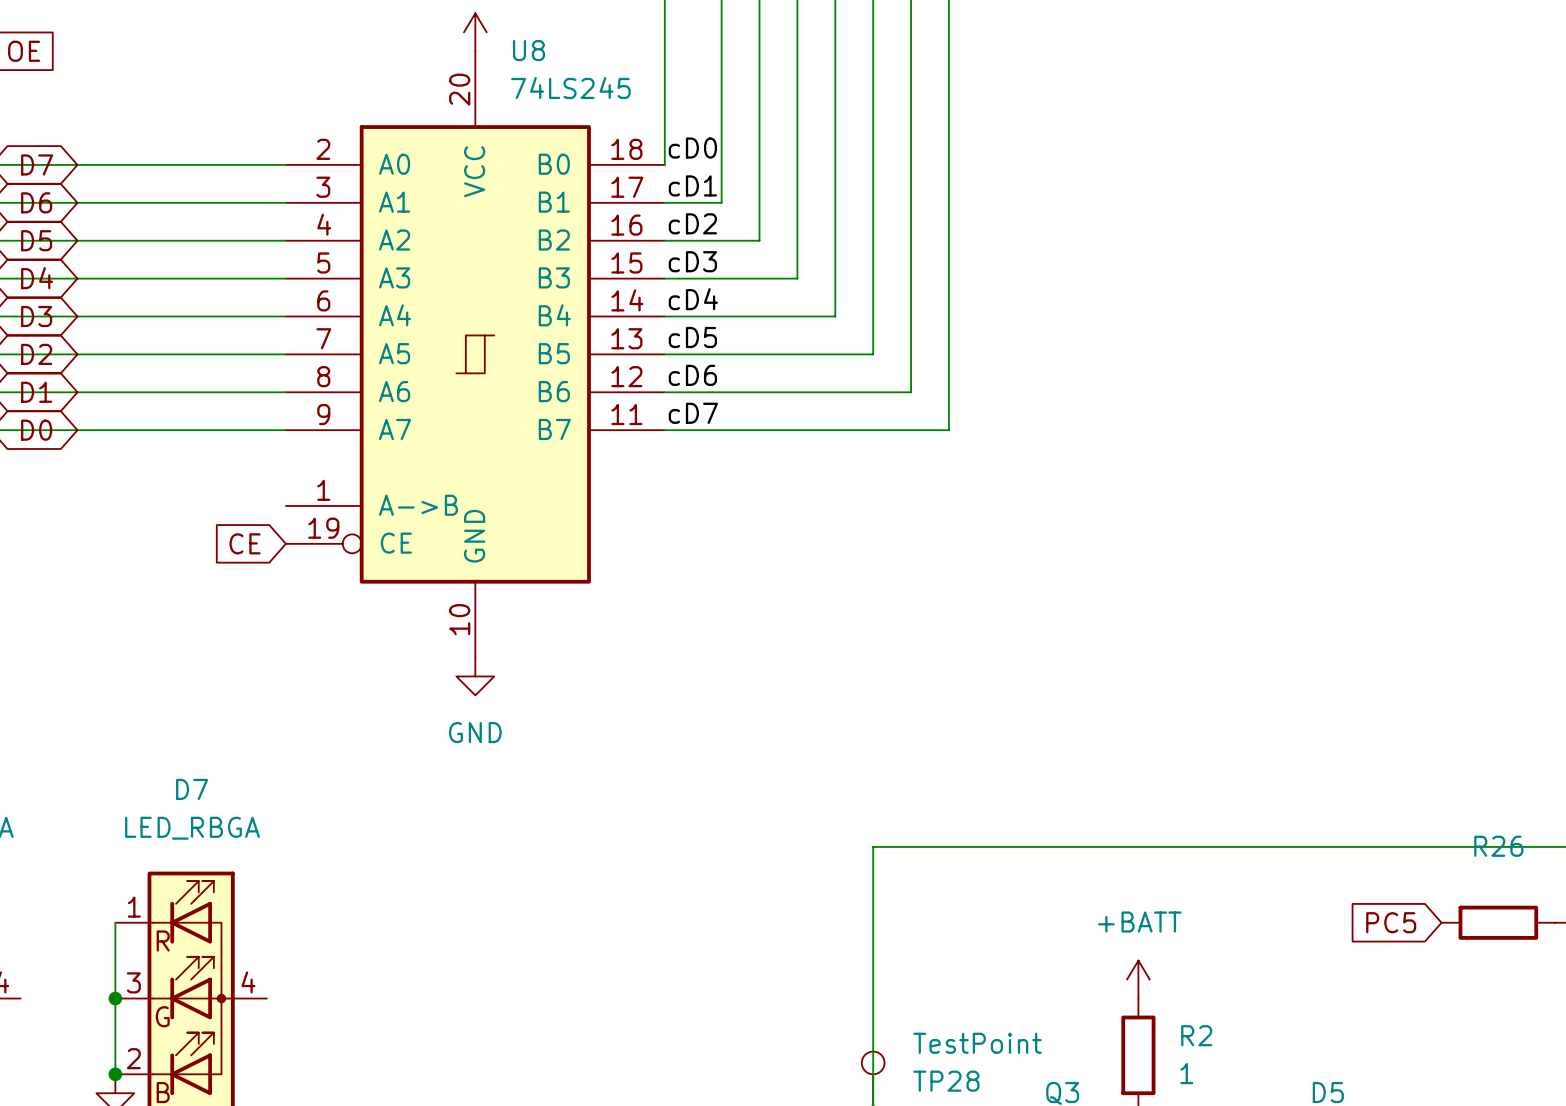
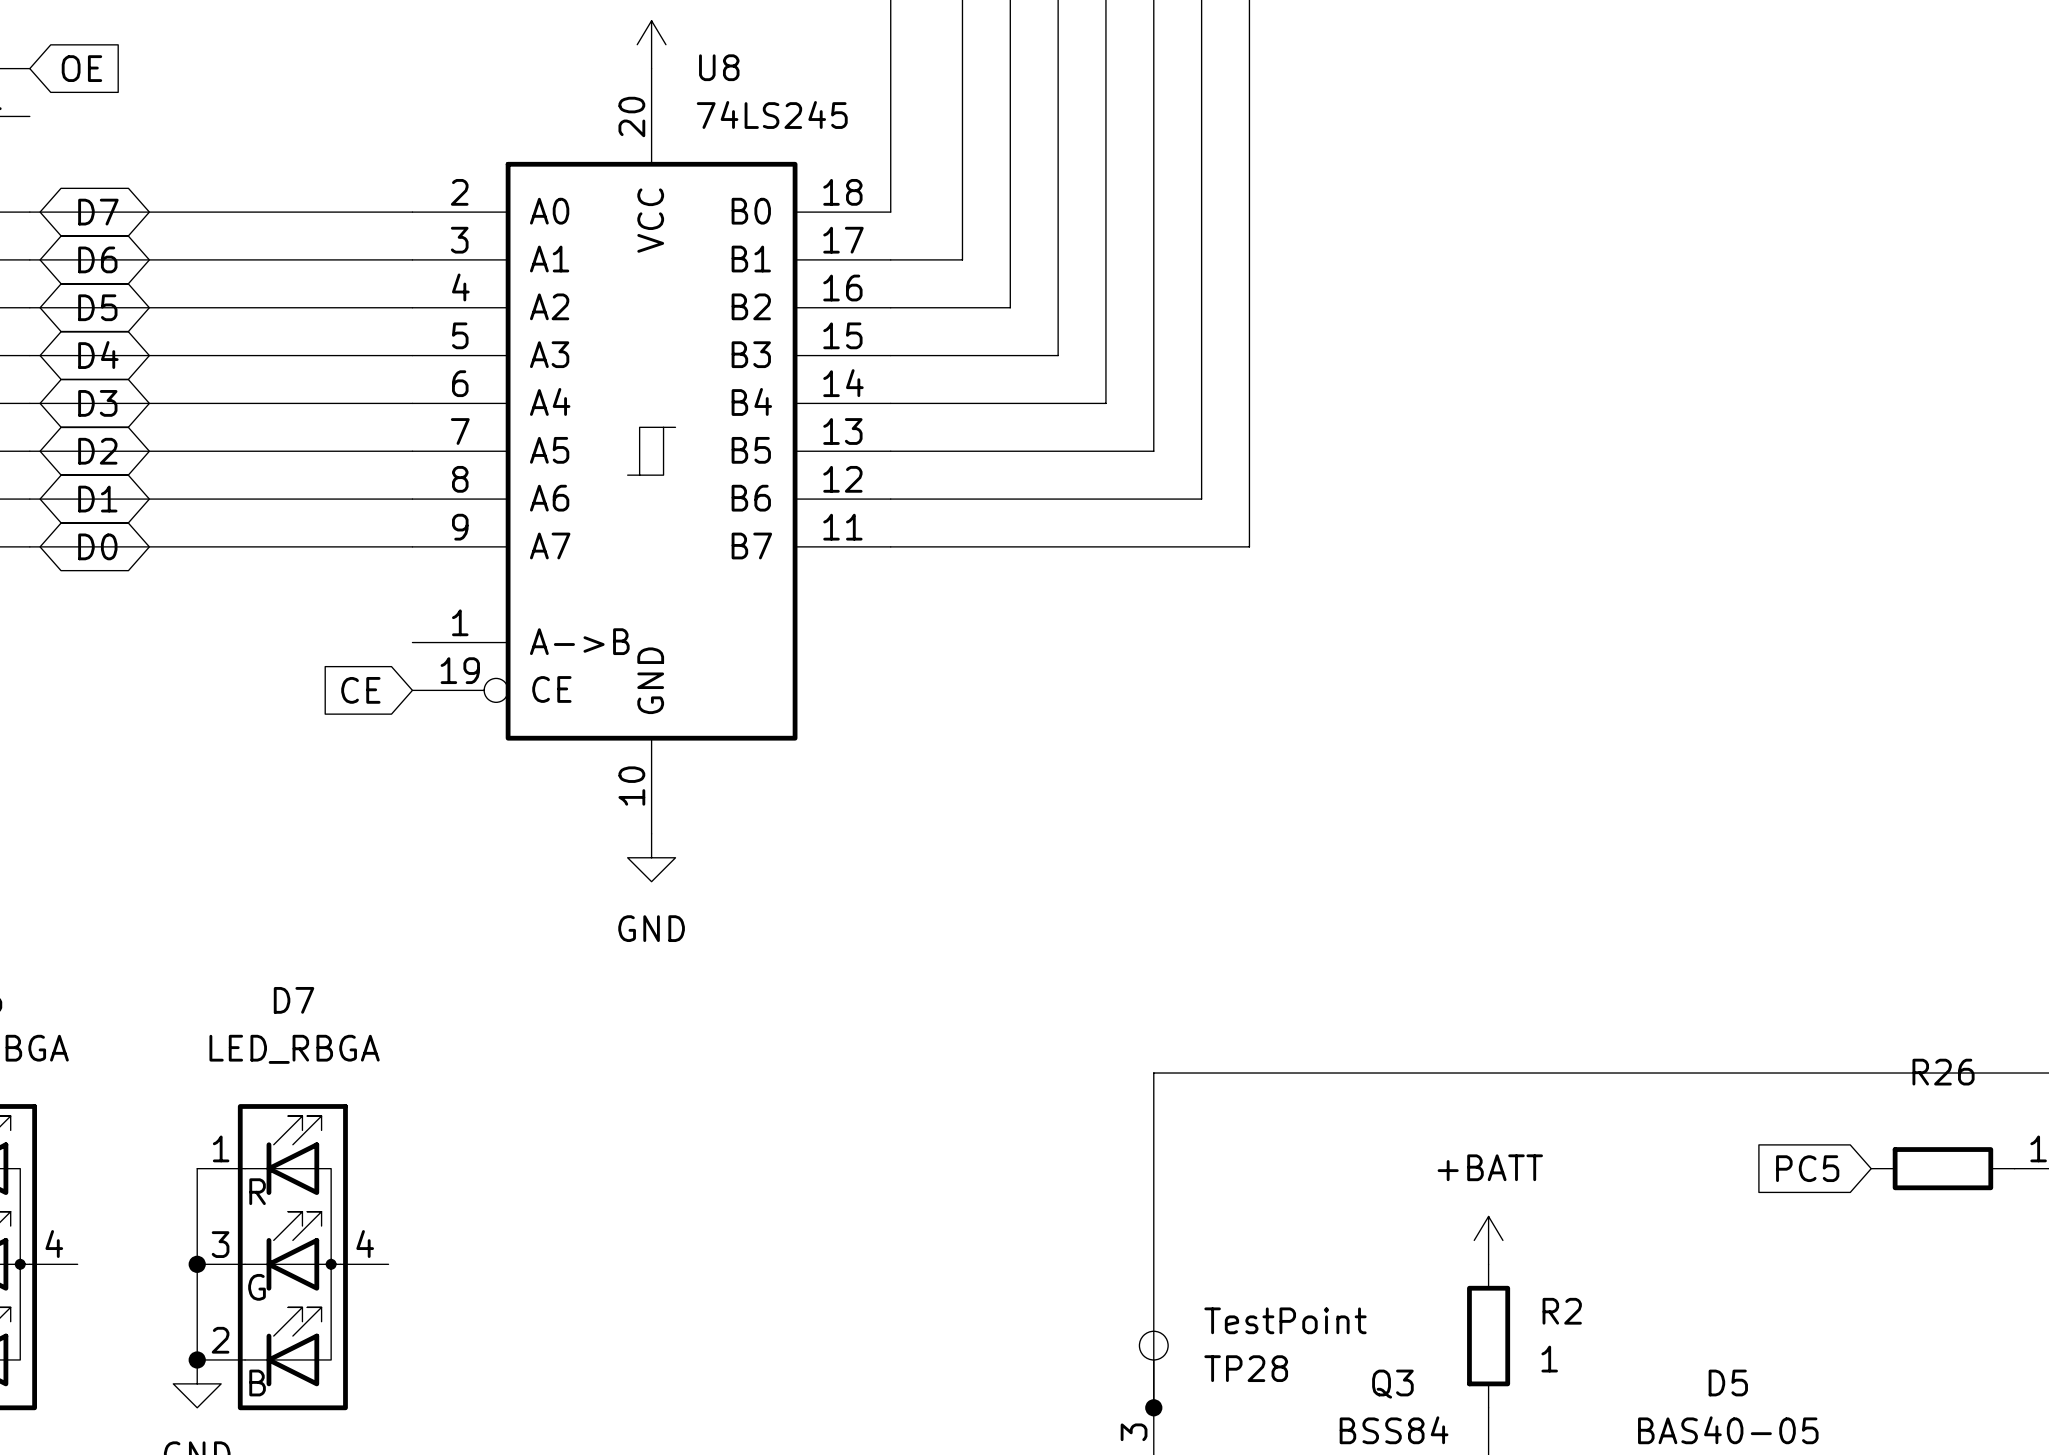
label: cD0 (692, 148) -> none
label: cD1 (692, 185) -> none
label: cD2 (692, 223) -> none
label: cD3 (692, 261) -> none
label: cD4 (693, 299) -> none
label: cD5 (692, 337) -> none
label: cD6 (692, 375) -> none
label: cD7 (693, 413) -> none

